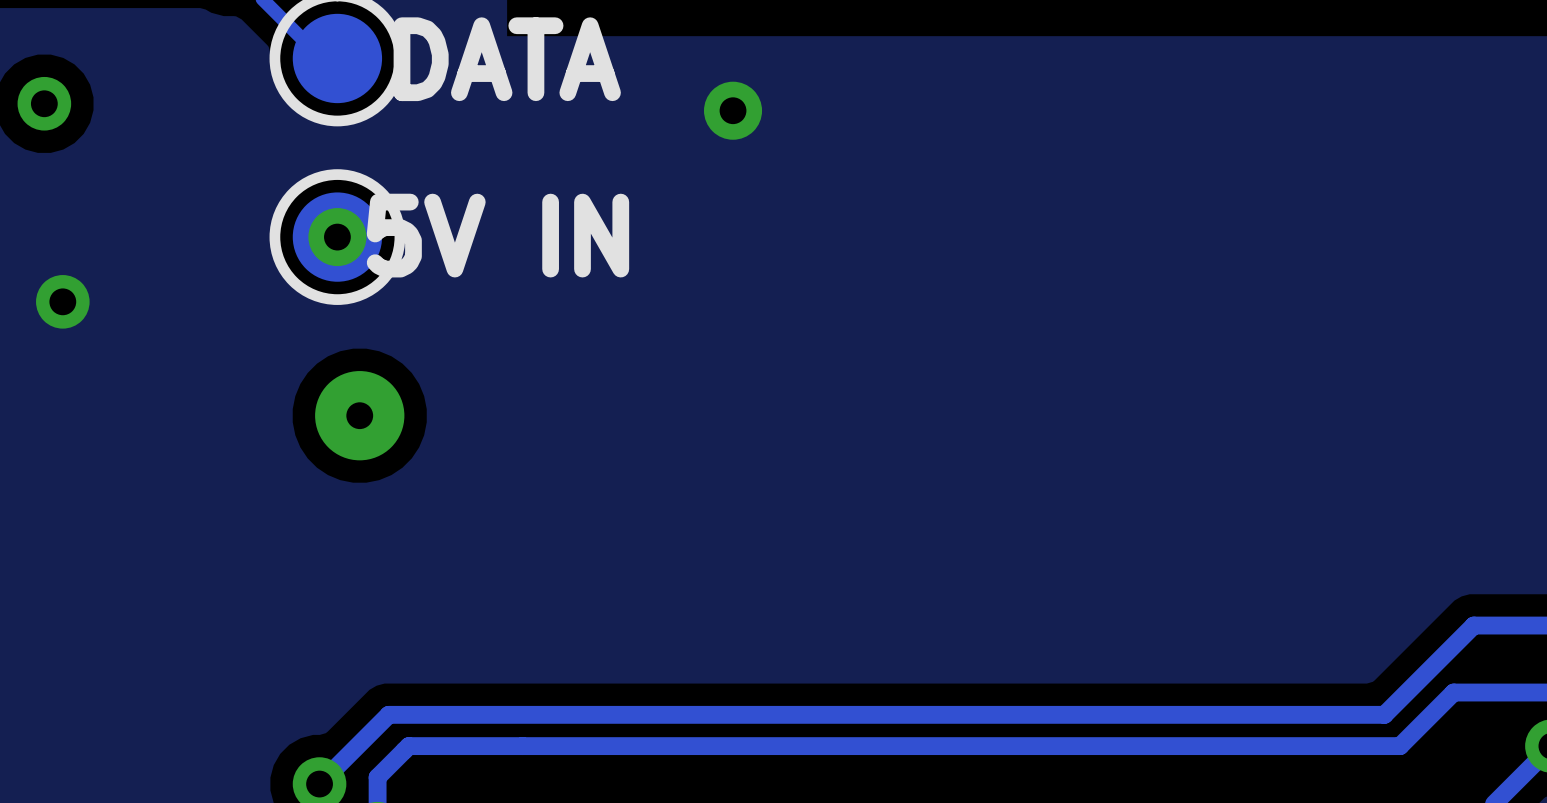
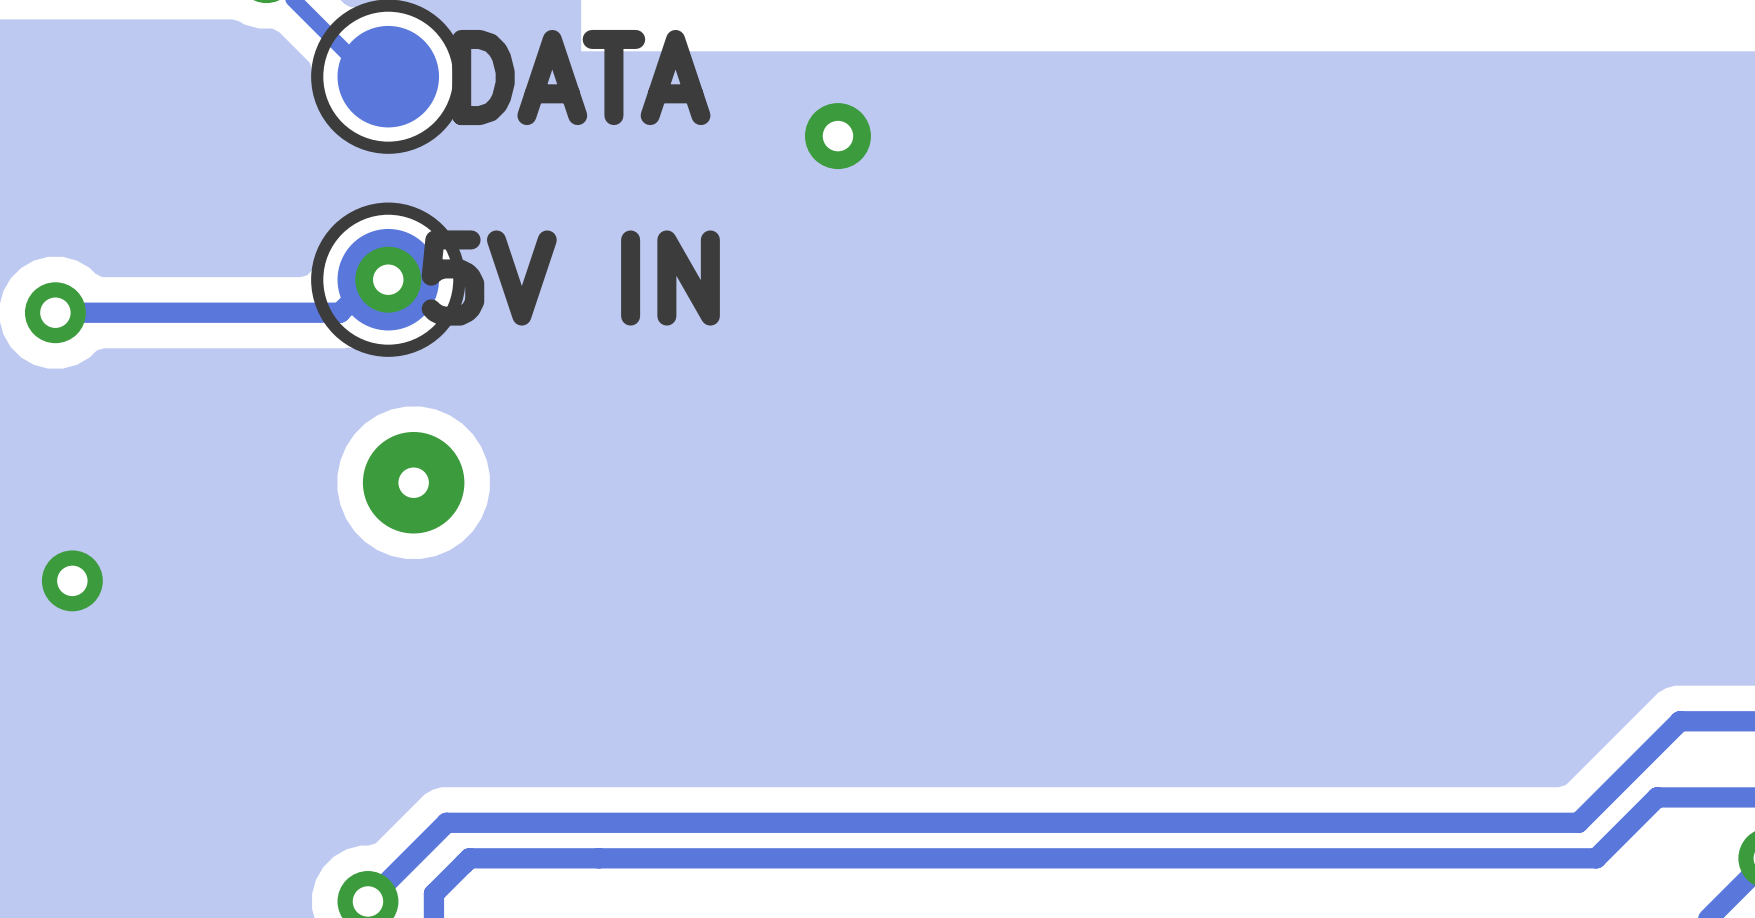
via: (44, 103) -> none
track: none -> (388, 279) (373, 279) (340, 312) (55, 312)
via position: (62, 301) -> (55, 312)
via: none -> (72, 580)

